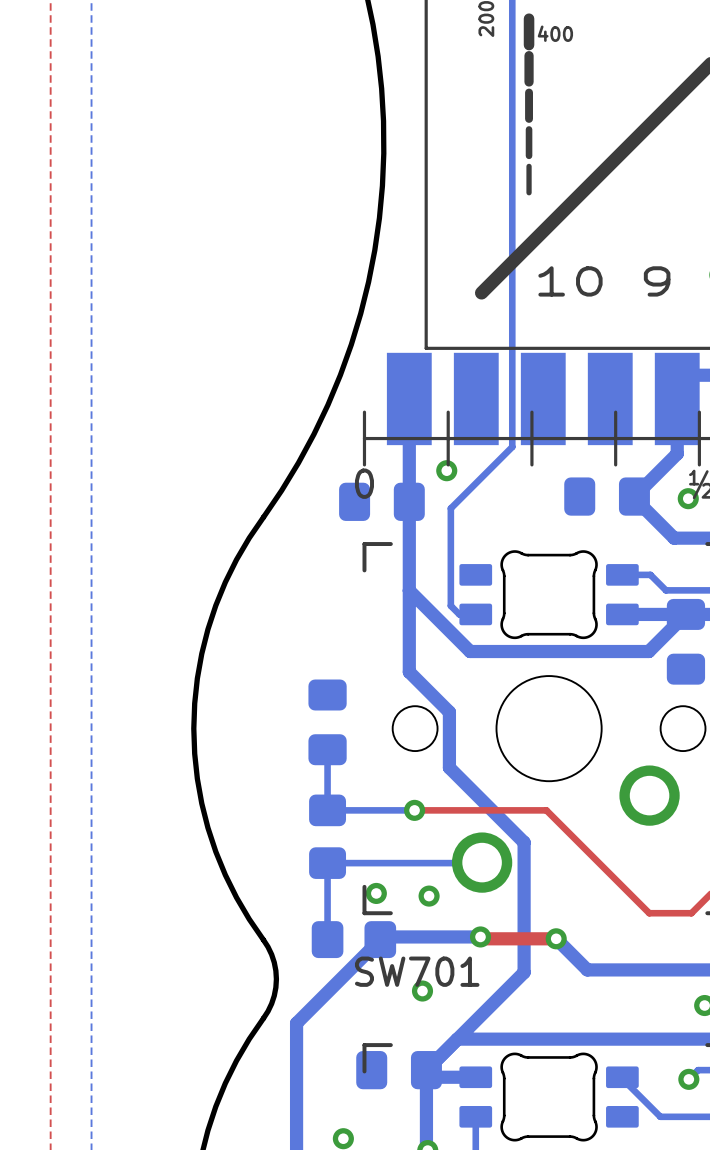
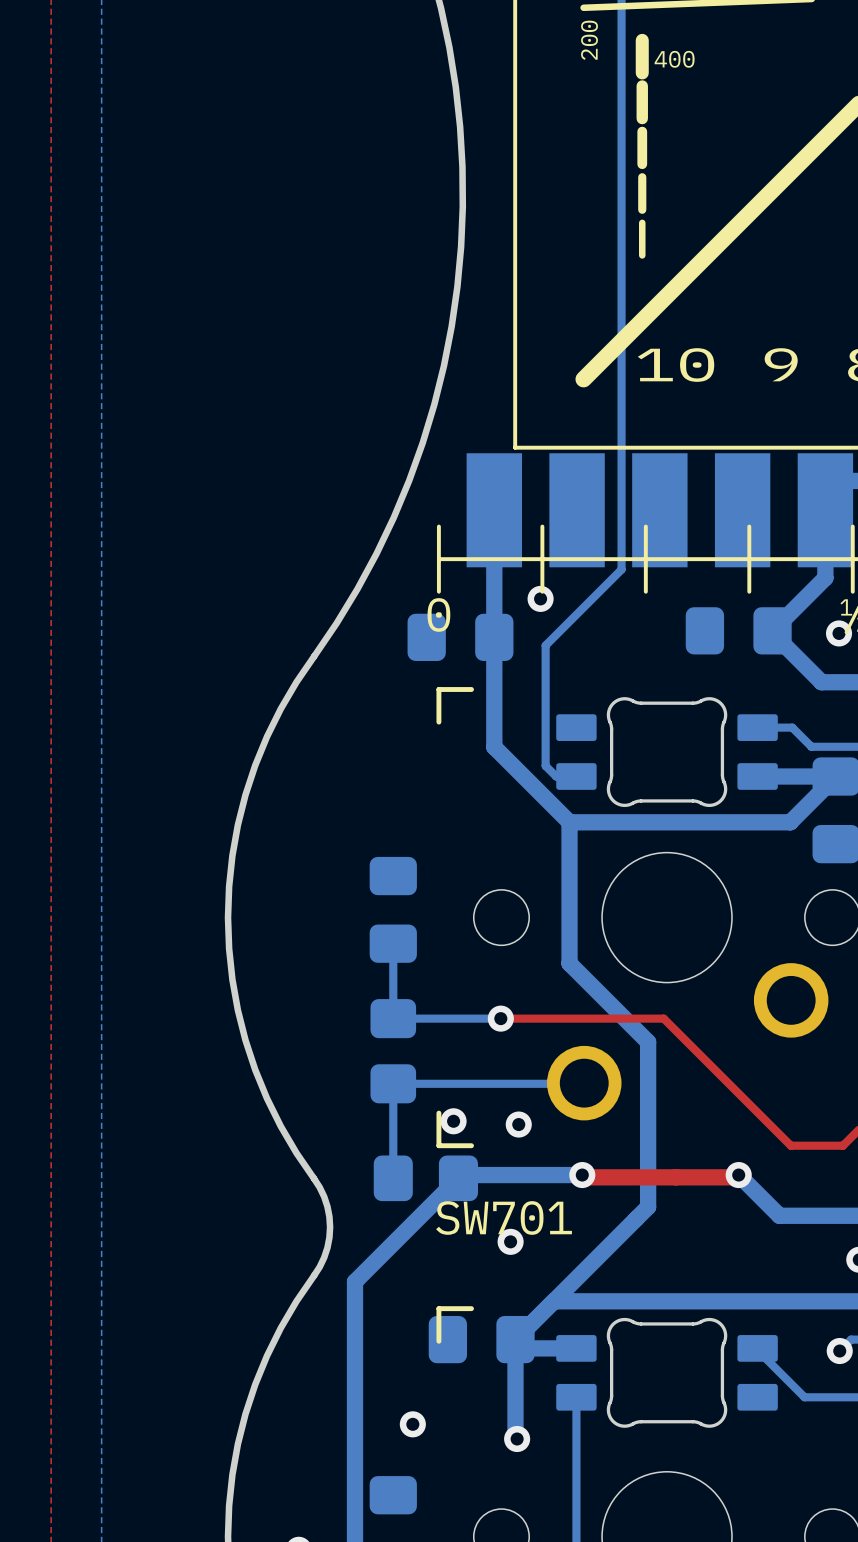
bottom track: (409, 590) (409, 672) (449, 712) (449, 767) (524, 842) (524, 972) -> (569, 822) (569, 963) (648, 1042) (648, 1206) (636, 1218)
top track: none -> (738, 1175) (736, 1177) (675, 1177)
bottom track: (556, 938) (587, 969) (640, 969) -> (738, 1175) (779, 1215)
via position: (556, 938) -> (738, 1175)

